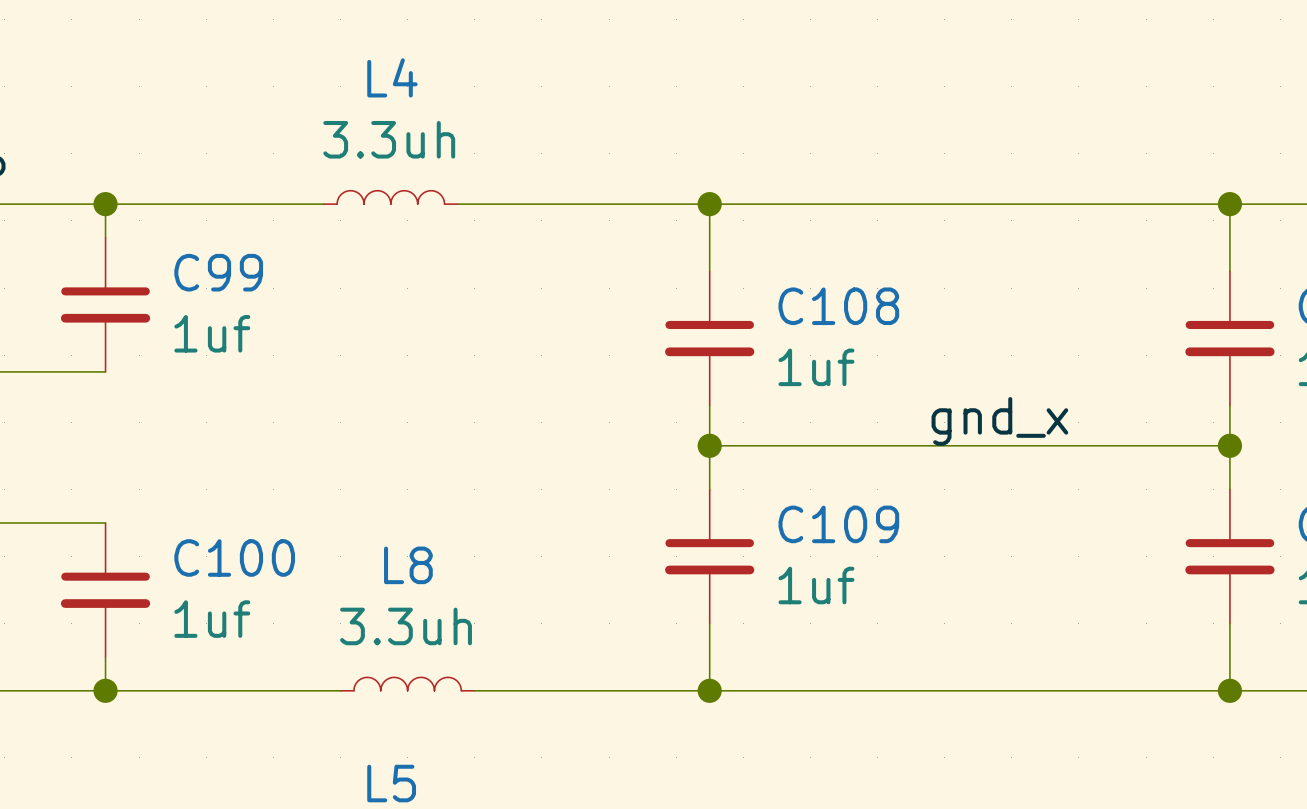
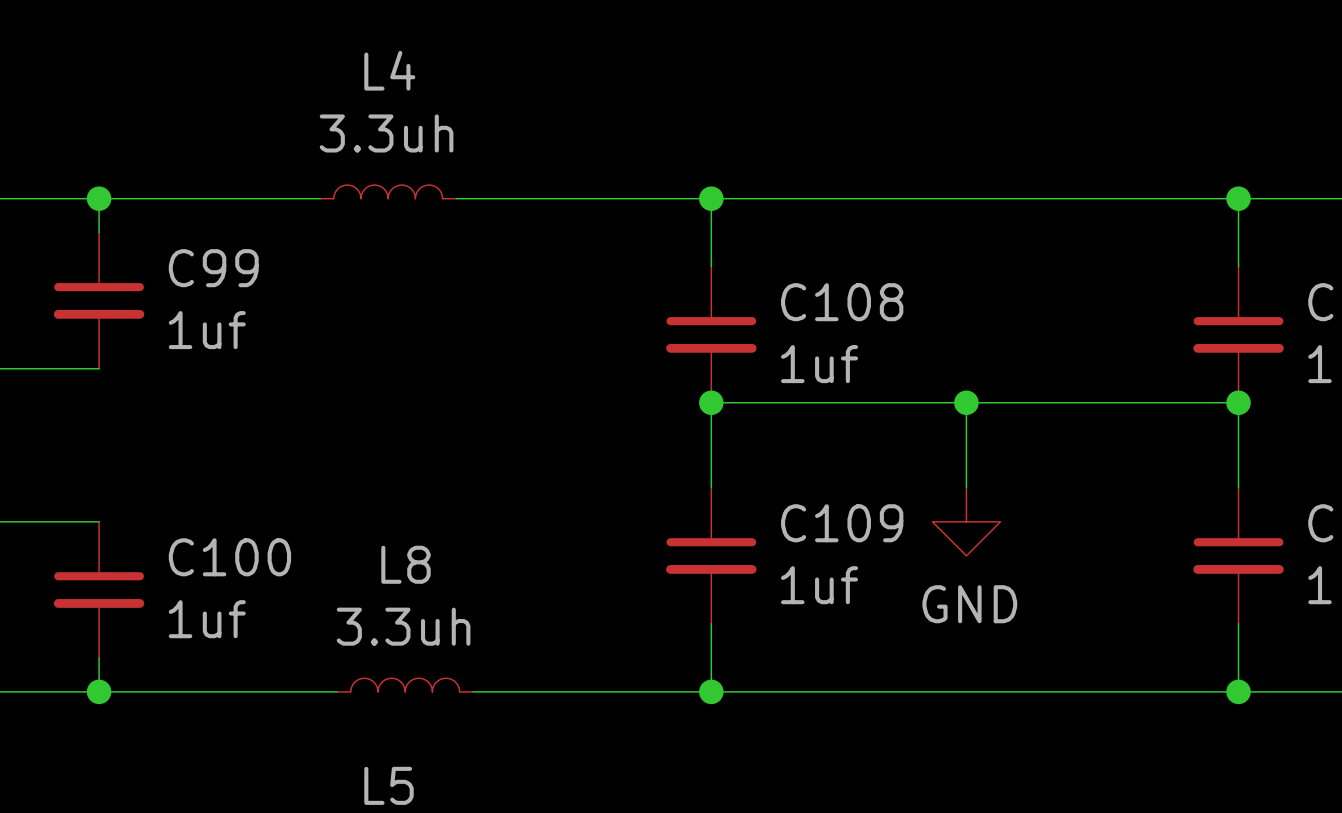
wire: none -> (966, 402) (966, 487)
junction: none -> (966, 402)
label: gnd_x (999, 421) -> none
wire: (709, 445) (1229, 445) -> (711, 402) (1238, 402)
junction position: (709, 445) -> (711, 402)
junction position: (1229, 445) -> (1238, 402)
power symbol: none -> GND (966, 521)

